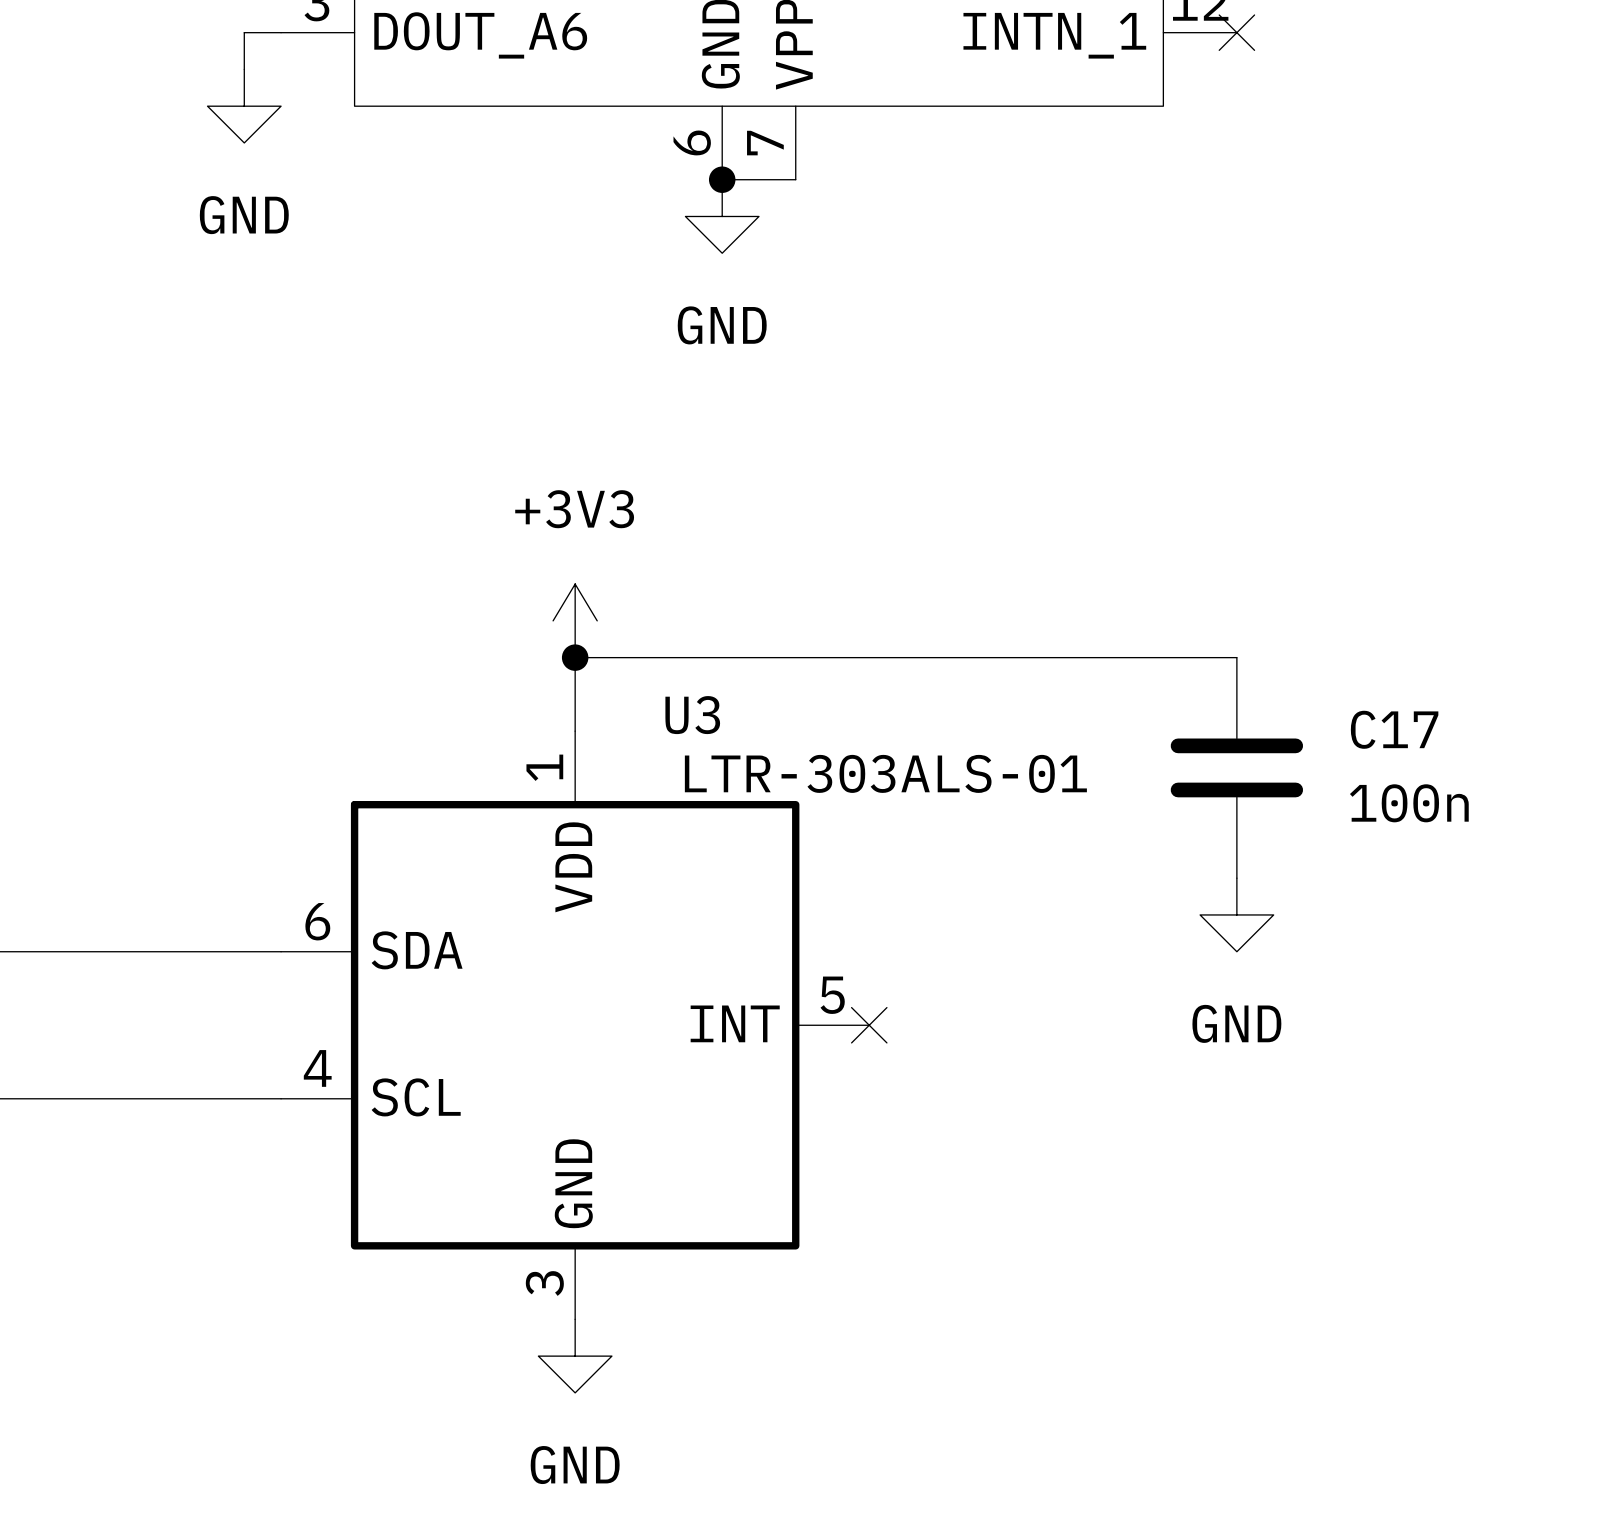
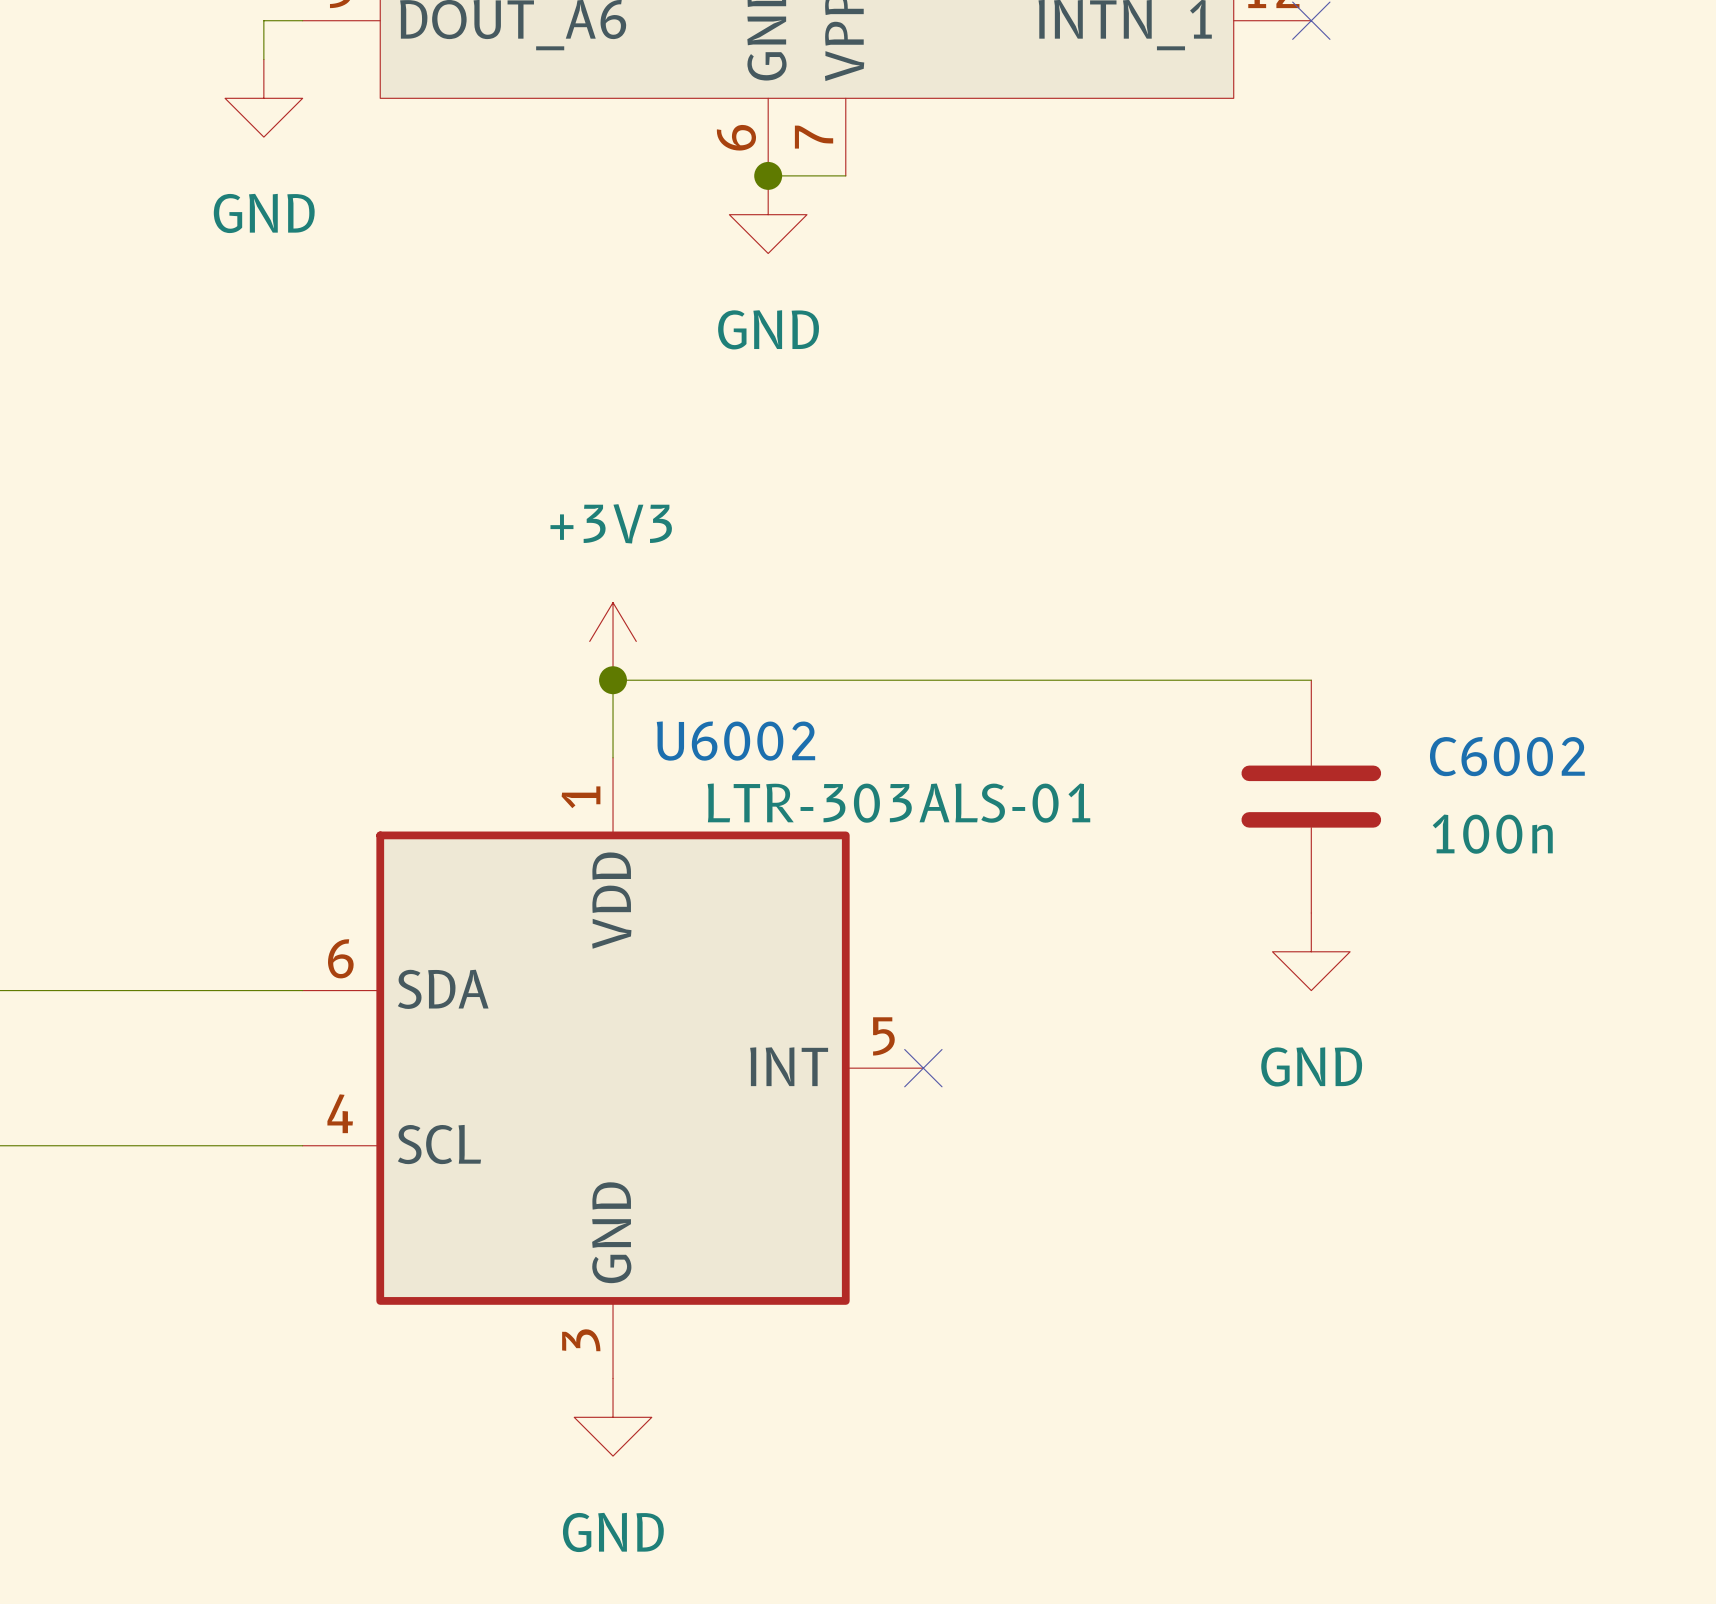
U3 name: U3 (692, 715) -> U6002 (735, 741)
C17 name: C17 (1394, 729) -> C6002 (1507, 756)
U3 value position: LTR-303ALS-01 (885, 773) -> LTR-303ALS-01 (898, 803)

